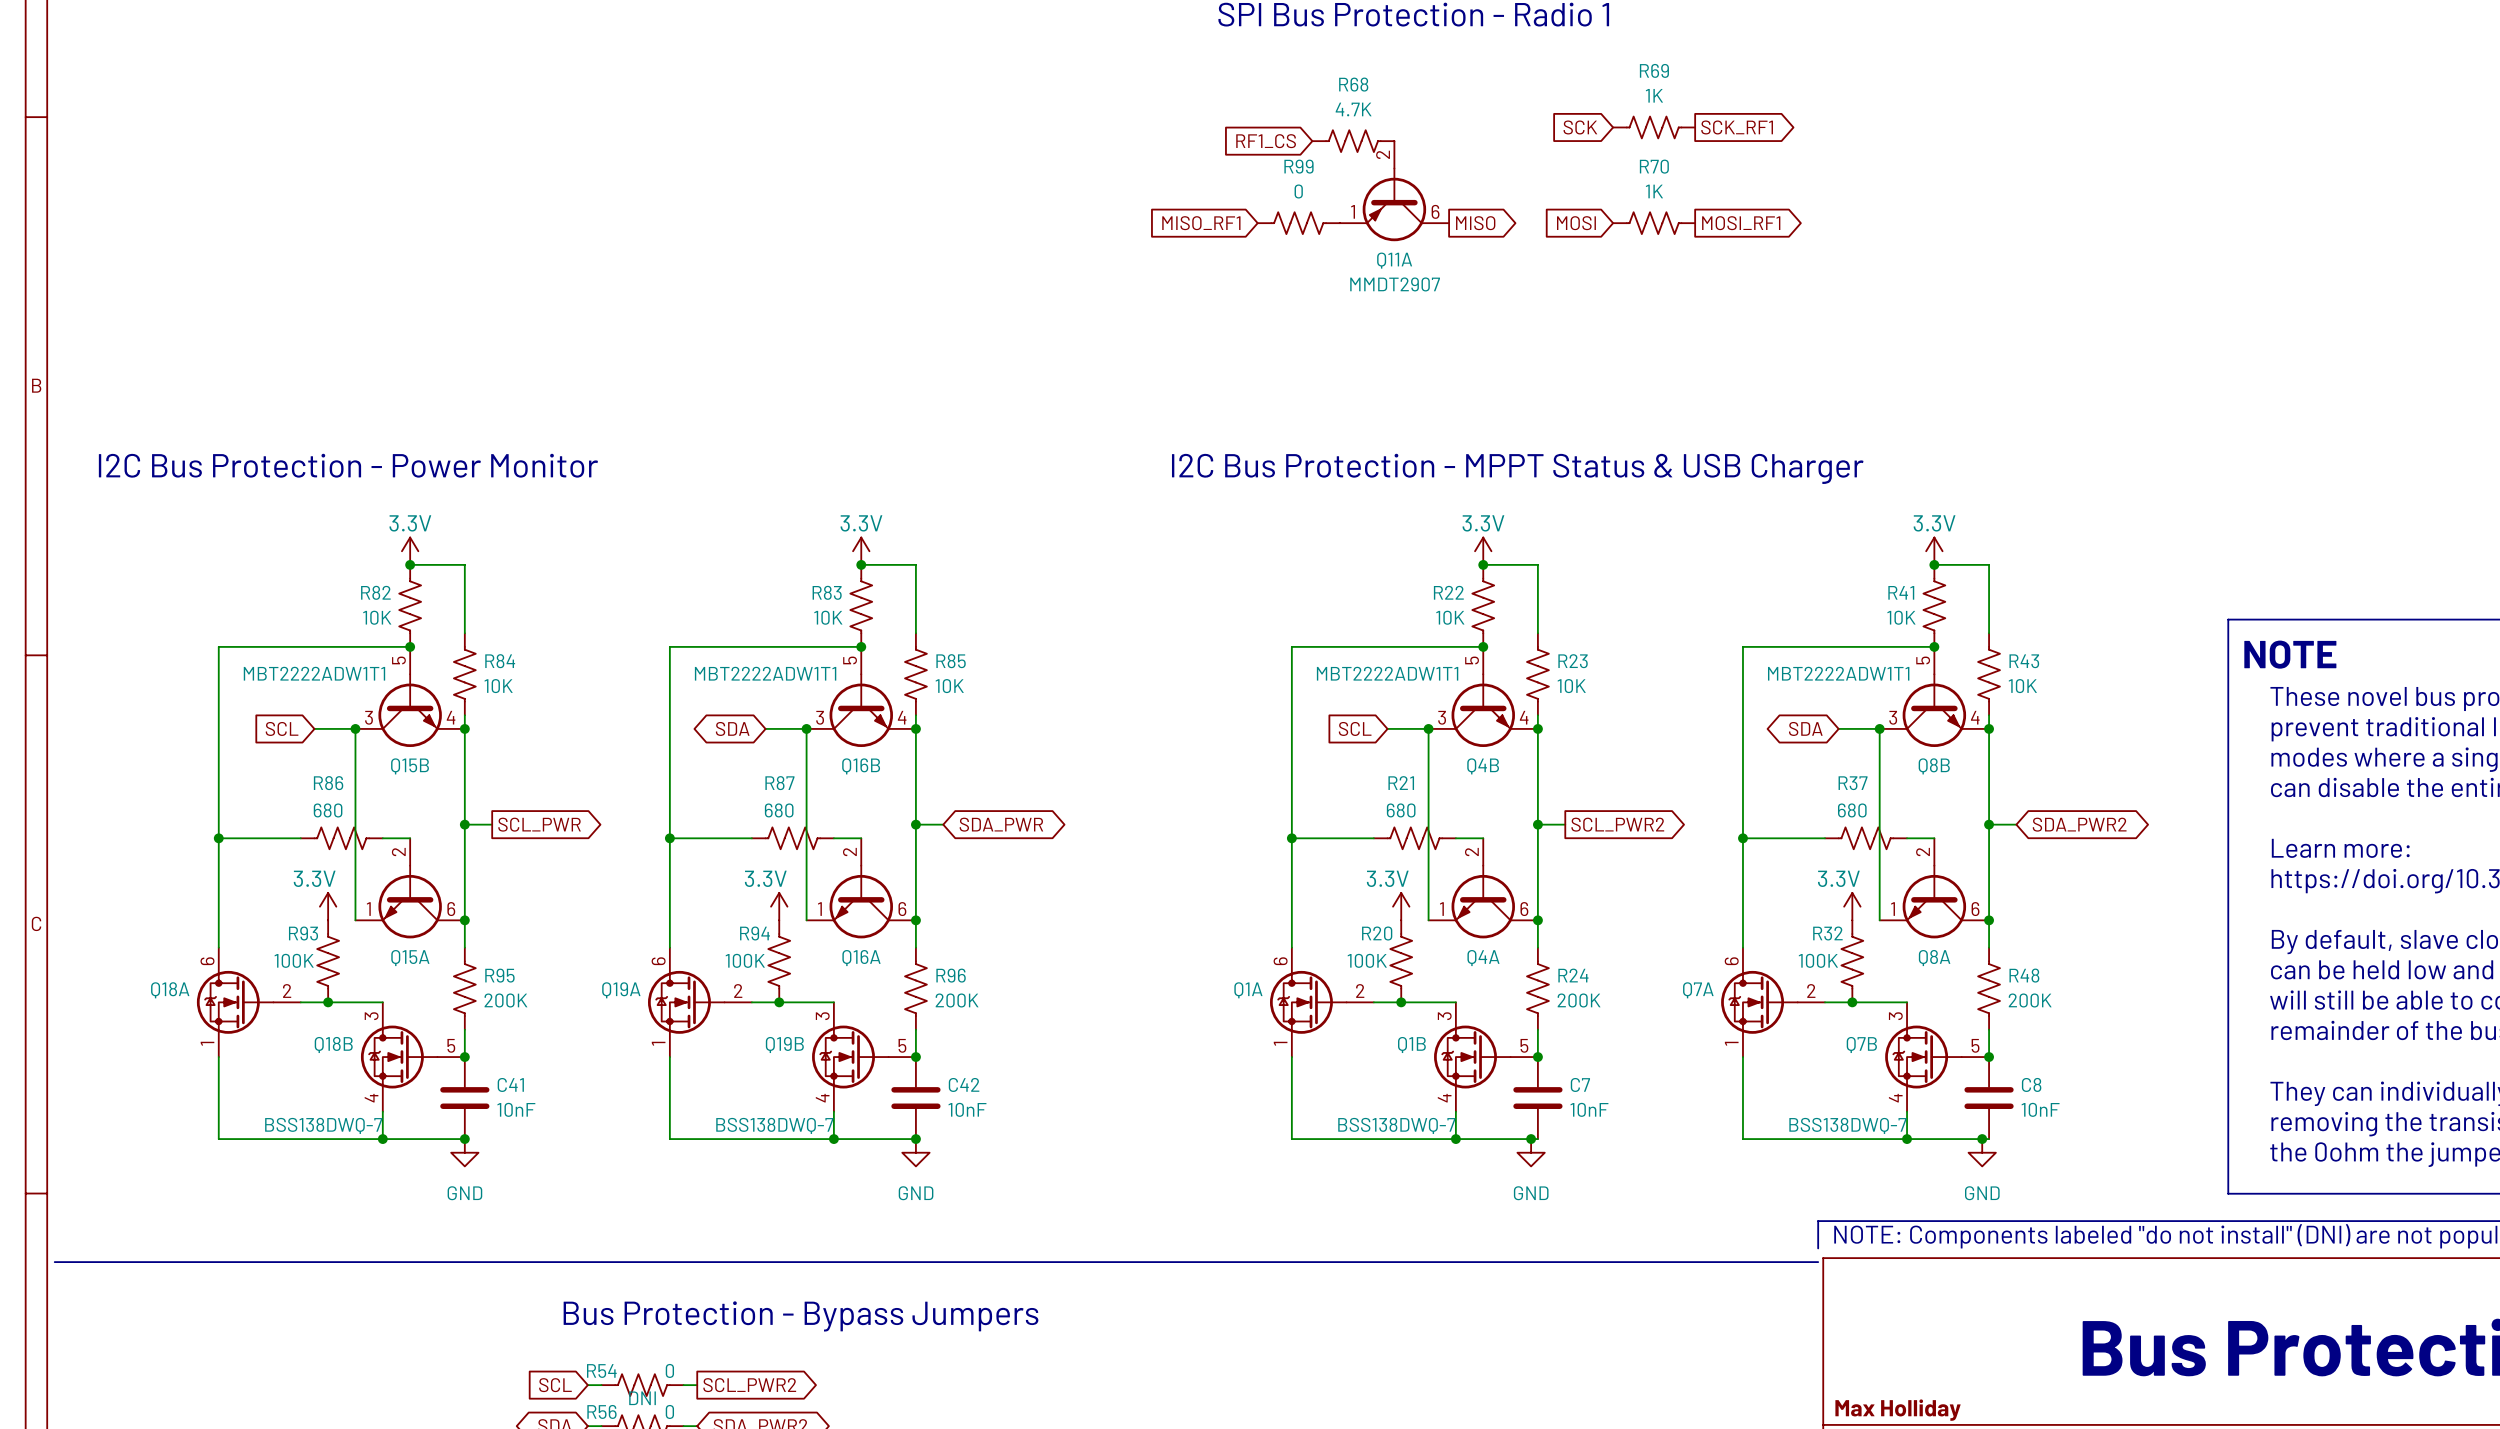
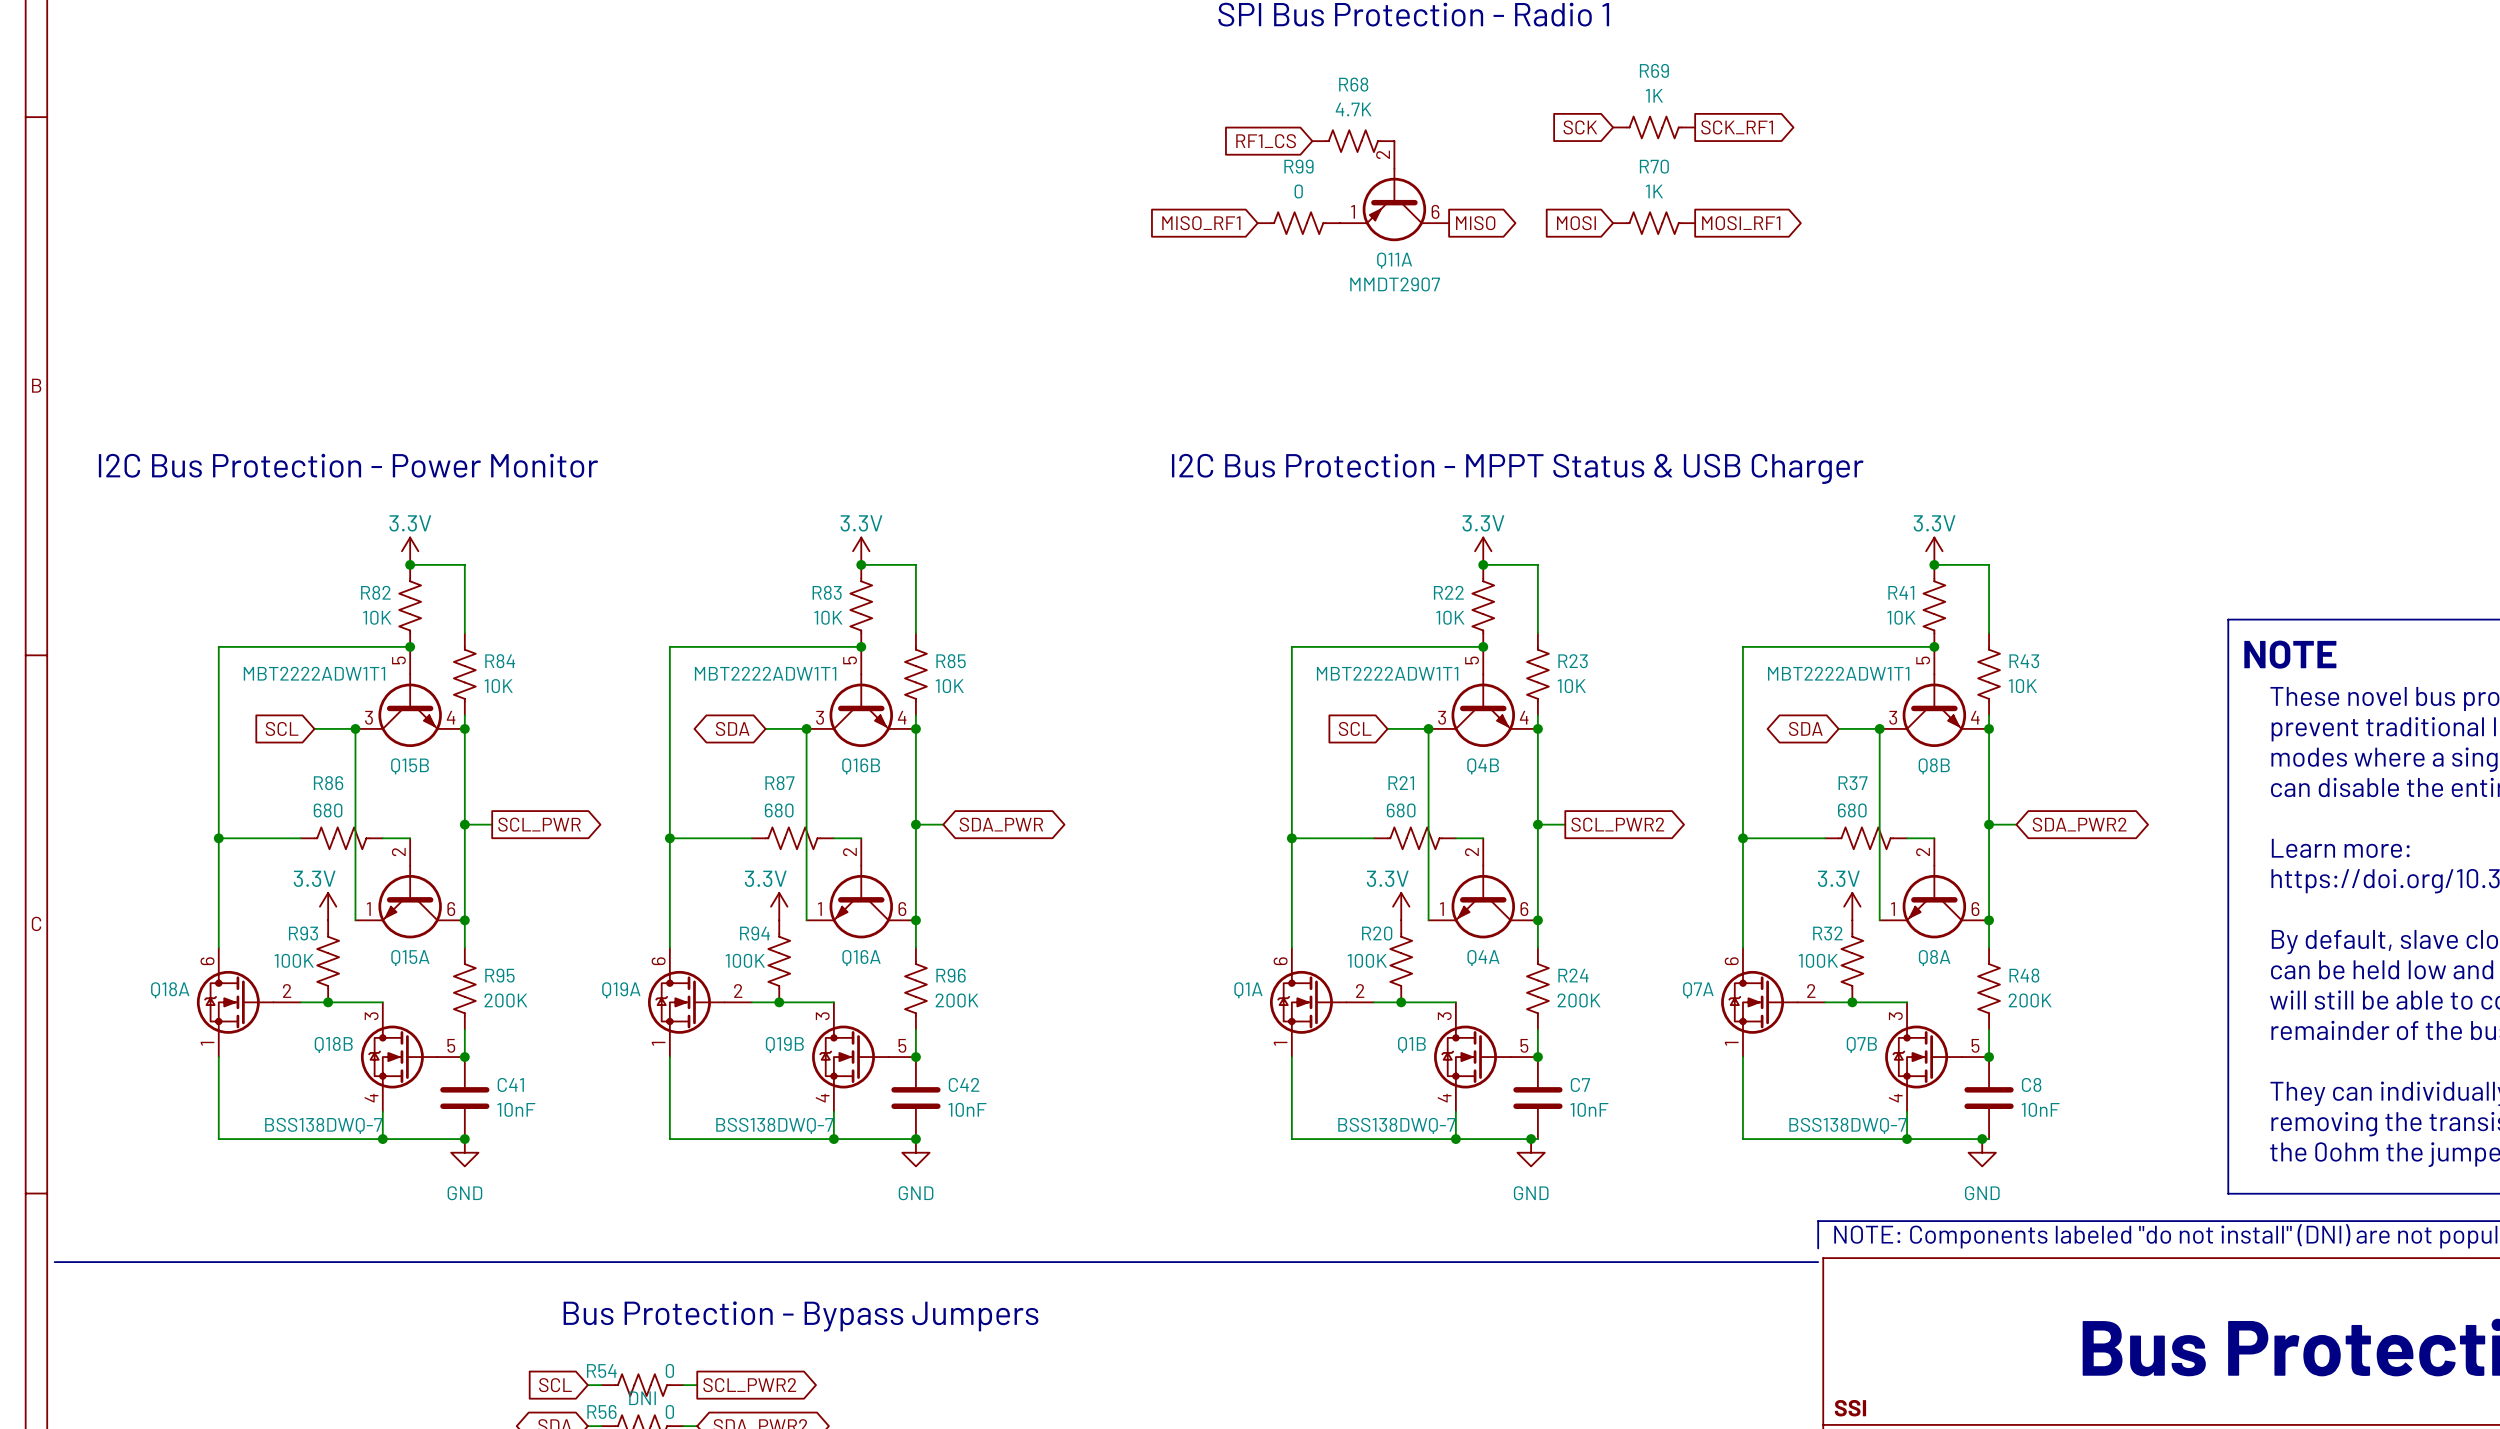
title block: Max Holliday (1898, 1410) -> SSI (1850, 1408)

